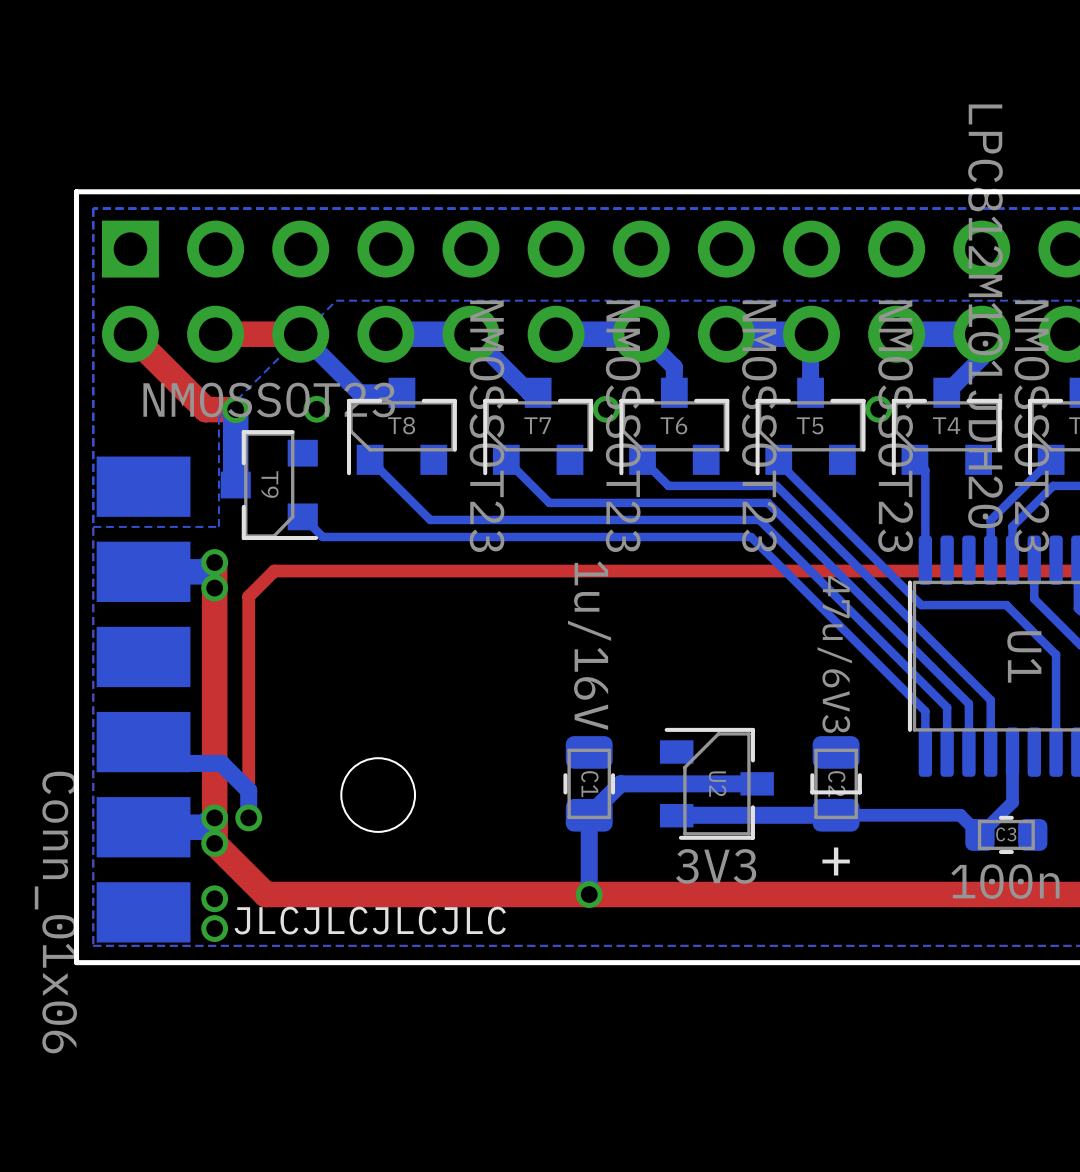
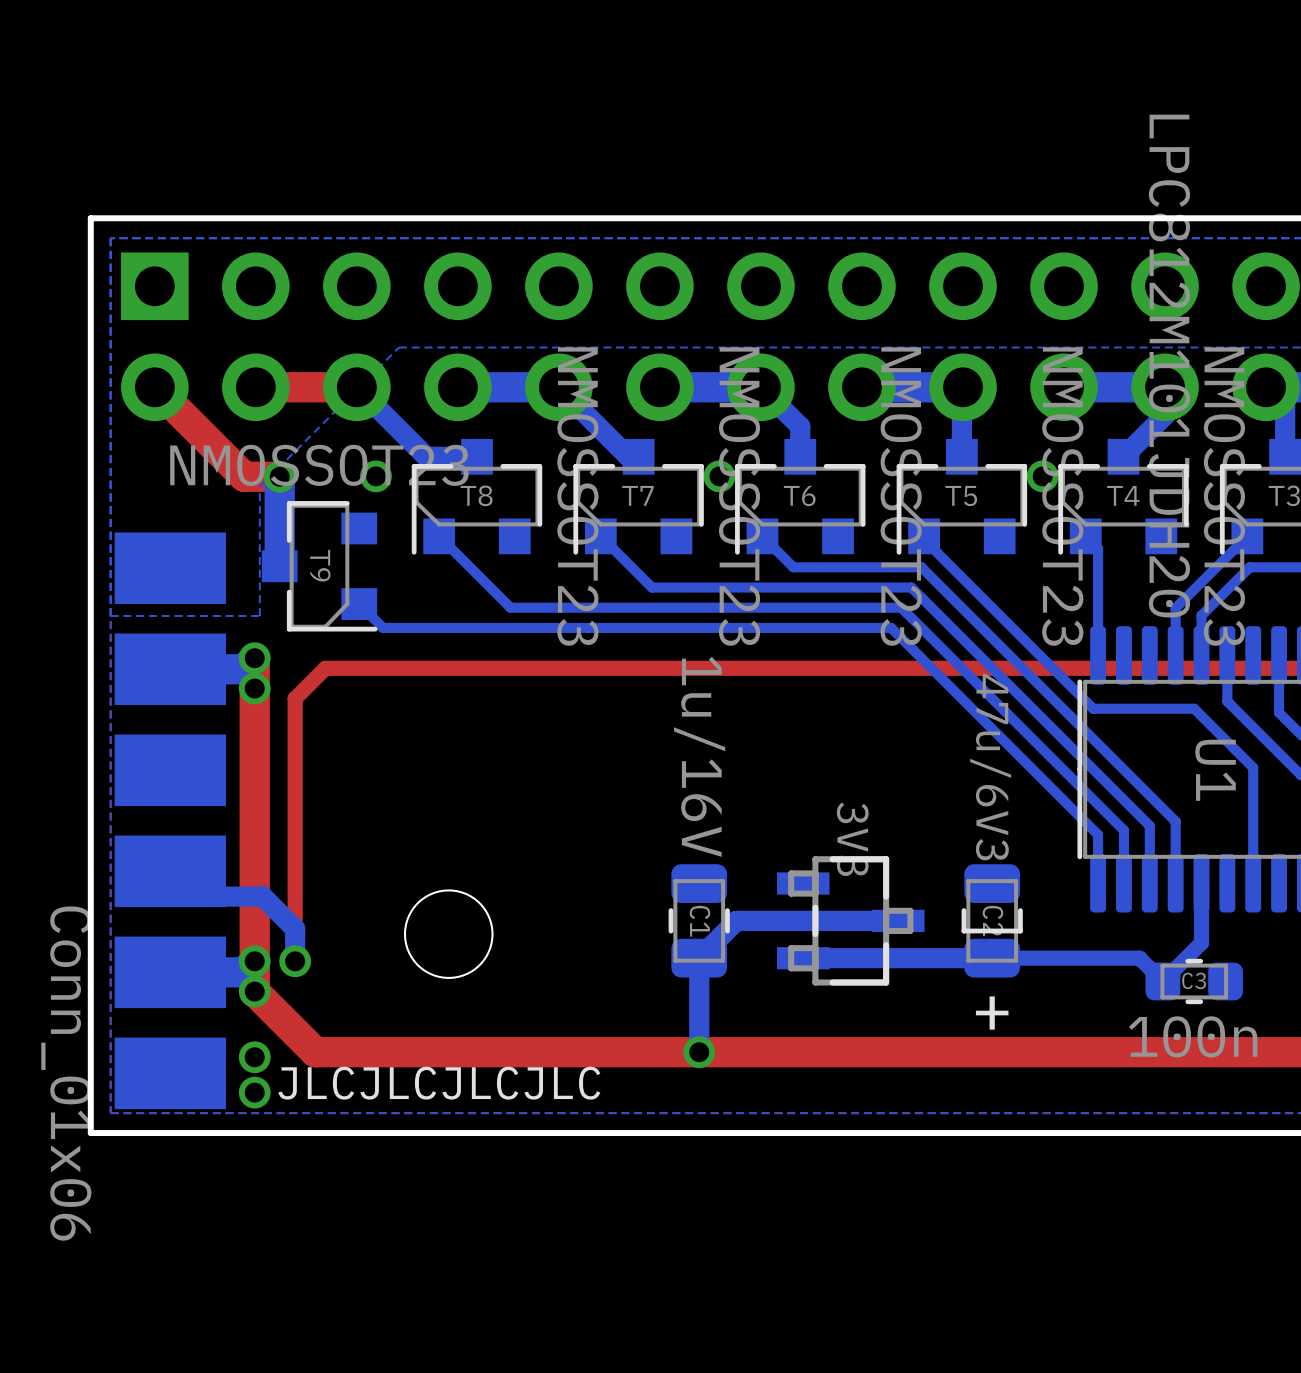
U2: 3V3 (716, 783) -> none
part: none -> 3V3 (850, 920)

